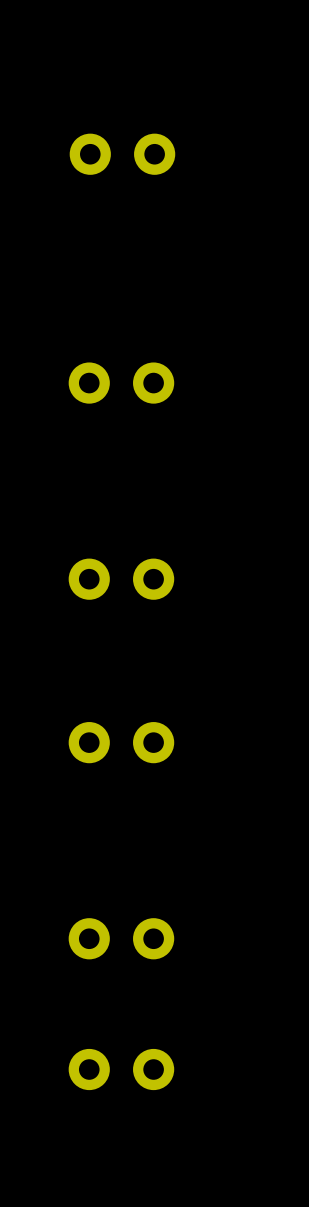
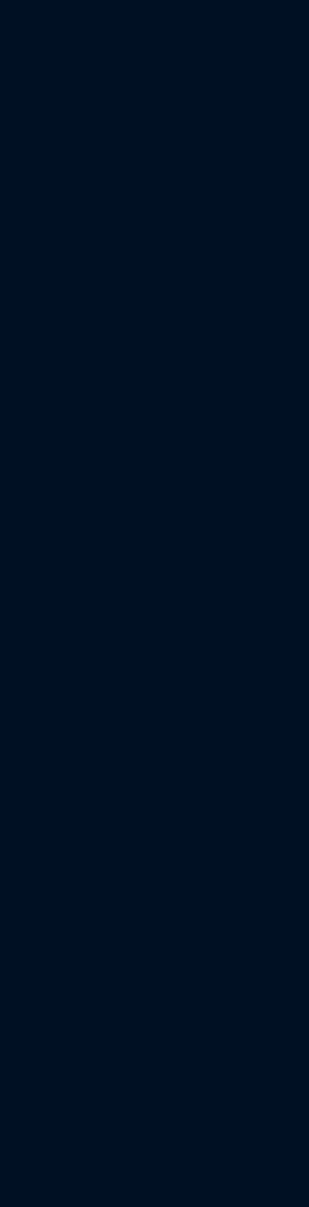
part: (122, 154) -> none
part: (121, 383) -> none
part: (121, 579) -> none
part: (121, 742) -> none
part: (121, 938) -> none
part: (121, 1069) -> none

